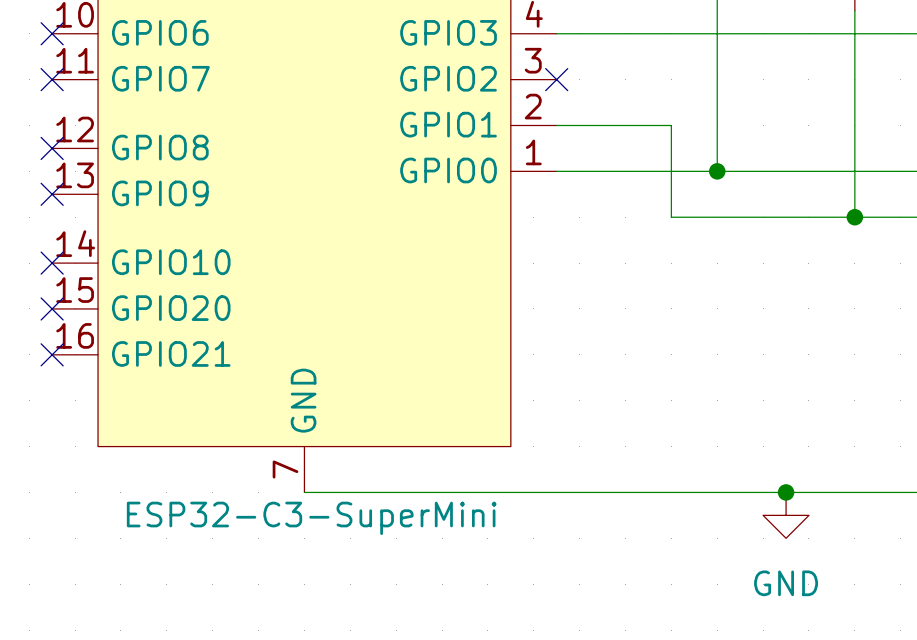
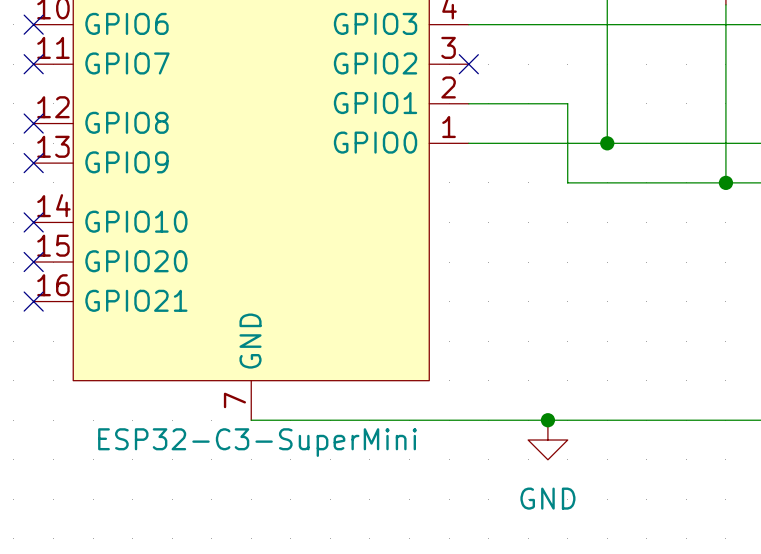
junction: none -> (547, 420)
junction: (786, 492) -> none
power symbol position: GND (786, 515) -> GND (547, 440)

